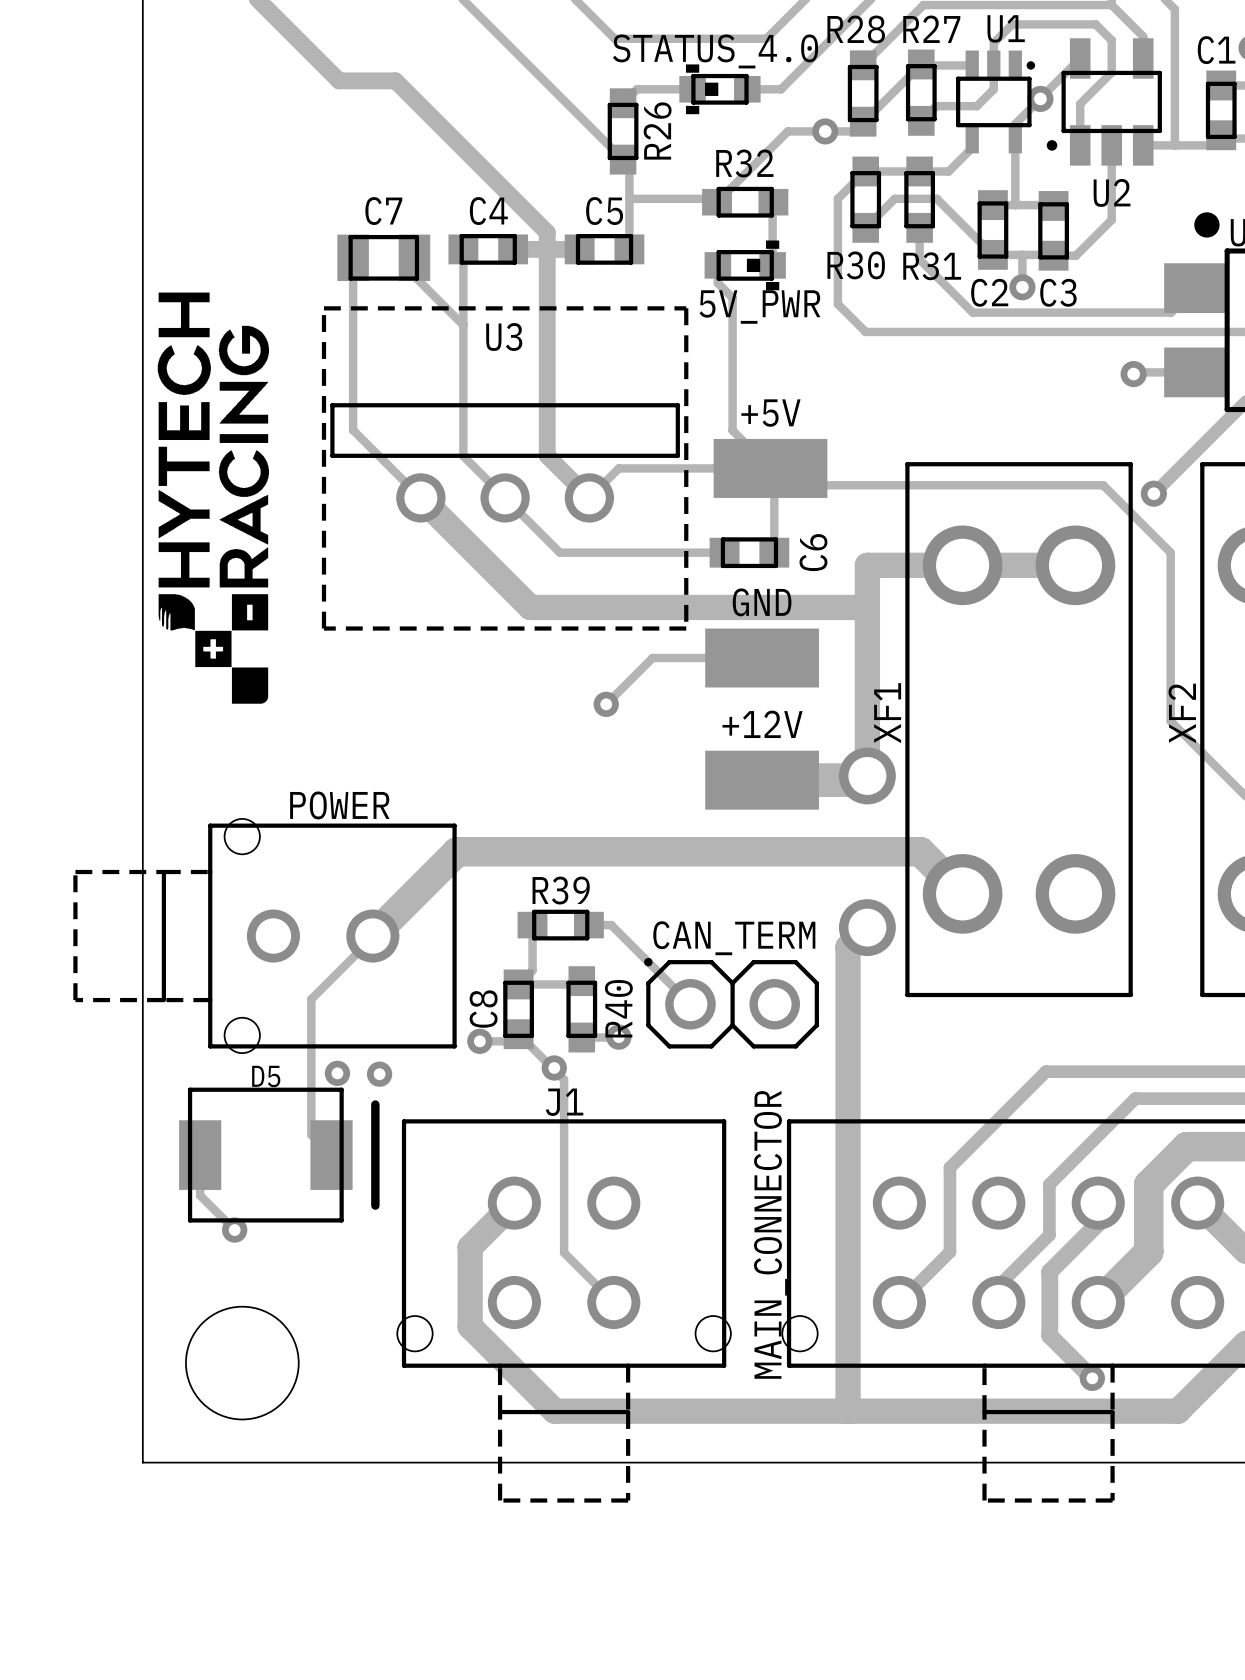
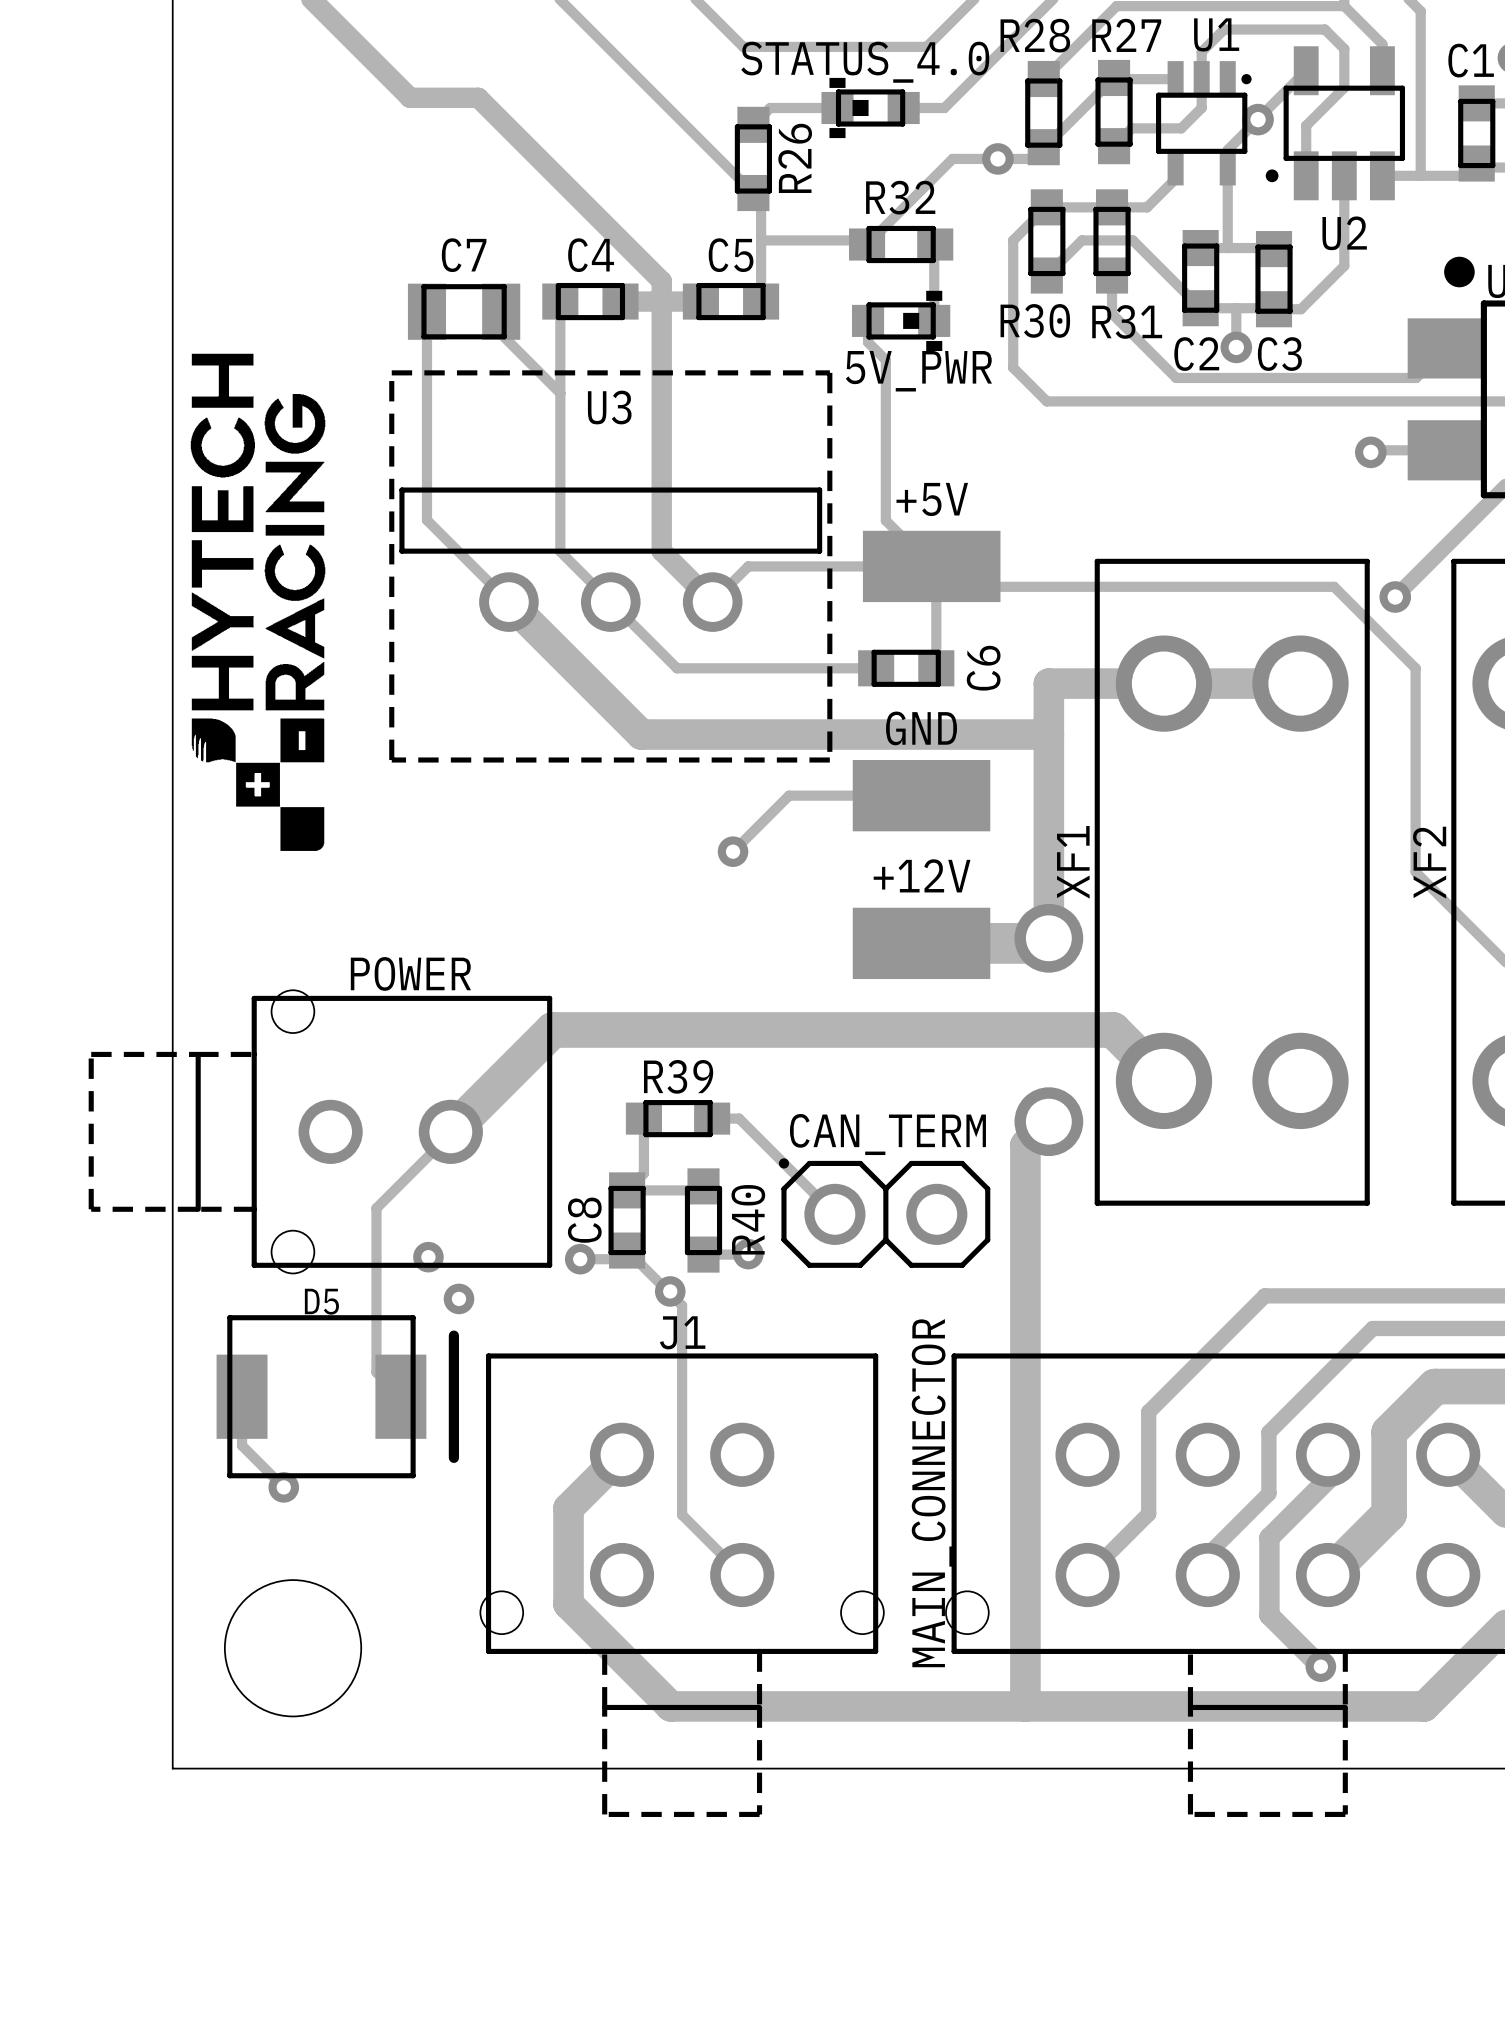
via position: (337, 1073) -> (428, 1257)

